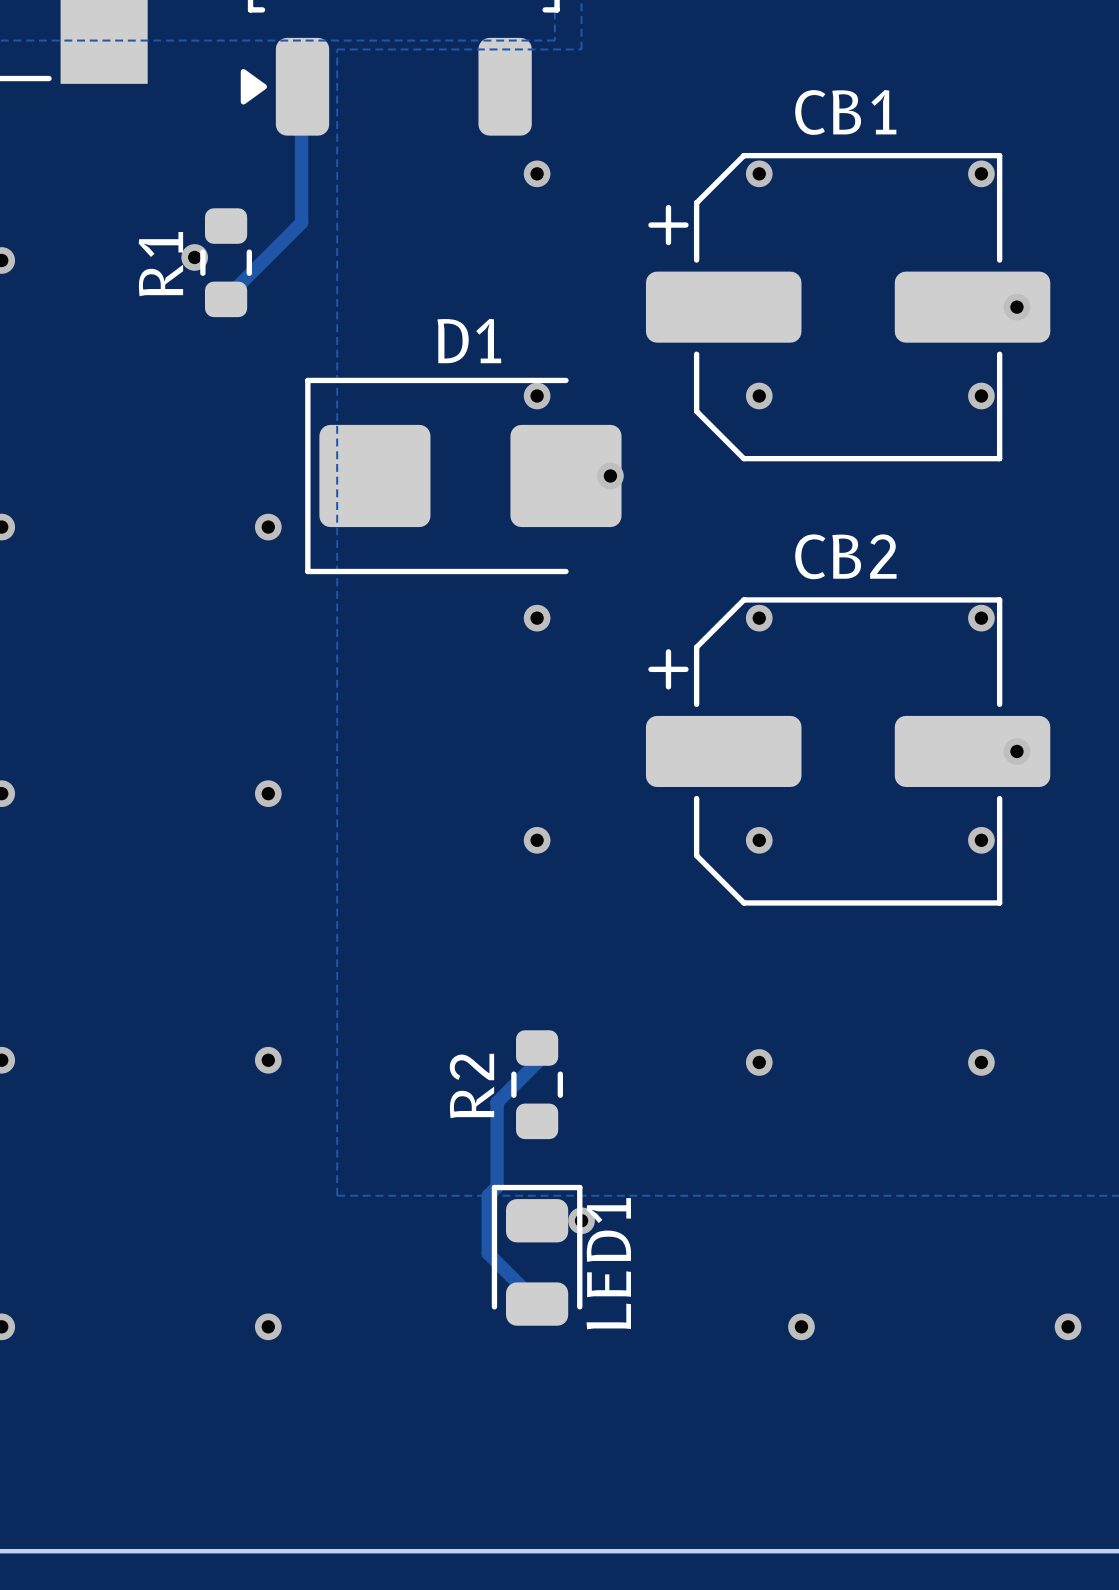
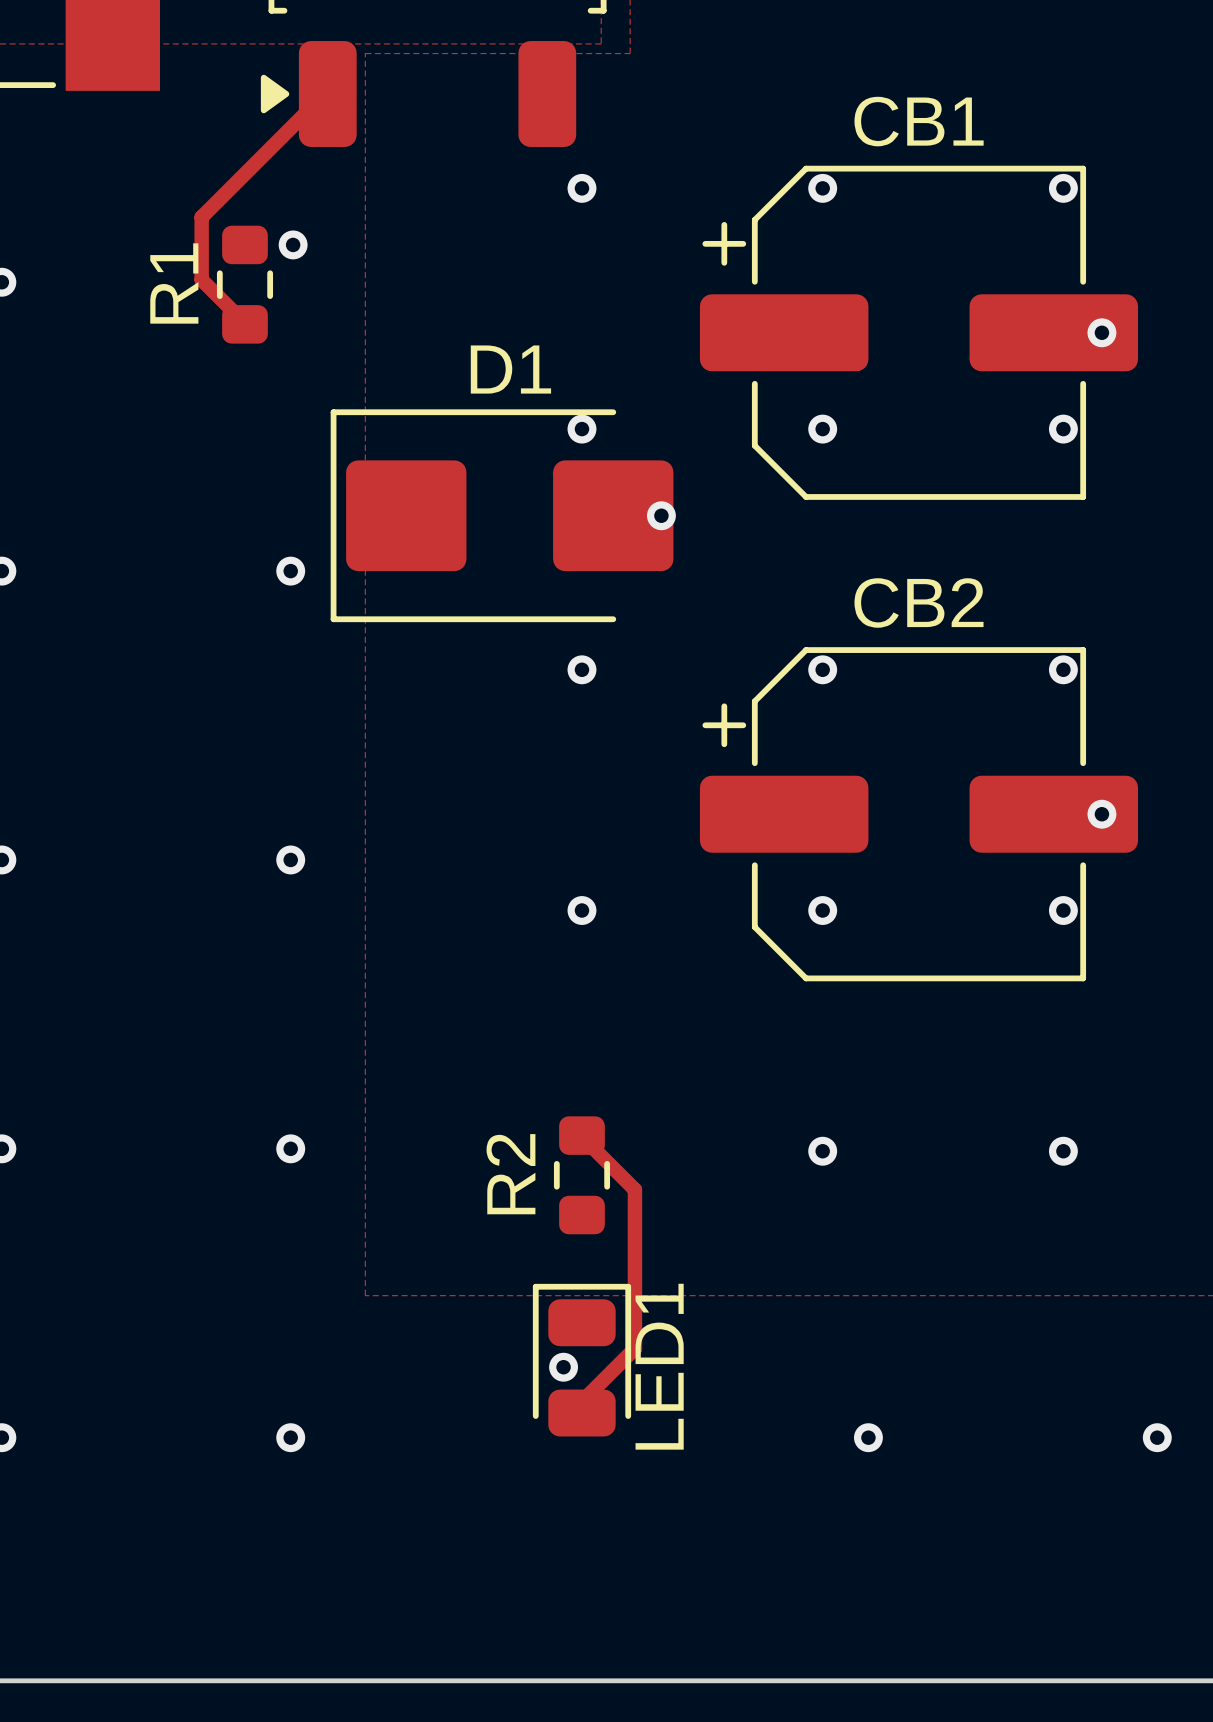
track: (301, 84) (301, 222) (226, 298) -> (326, 92) (201, 217) (201, 279) (244, 323)
via position: (194, 257) -> (293, 244)
track: (537, 1049) (537, 1062) (497, 1102) (497, 1186) (488, 1195) (488, 1253) (537, 1302) -> (581, 1136) (634, 1189) (634, 1348) (581, 1401) (581, 1411)
via position: (581, 1220) -> (563, 1367)

